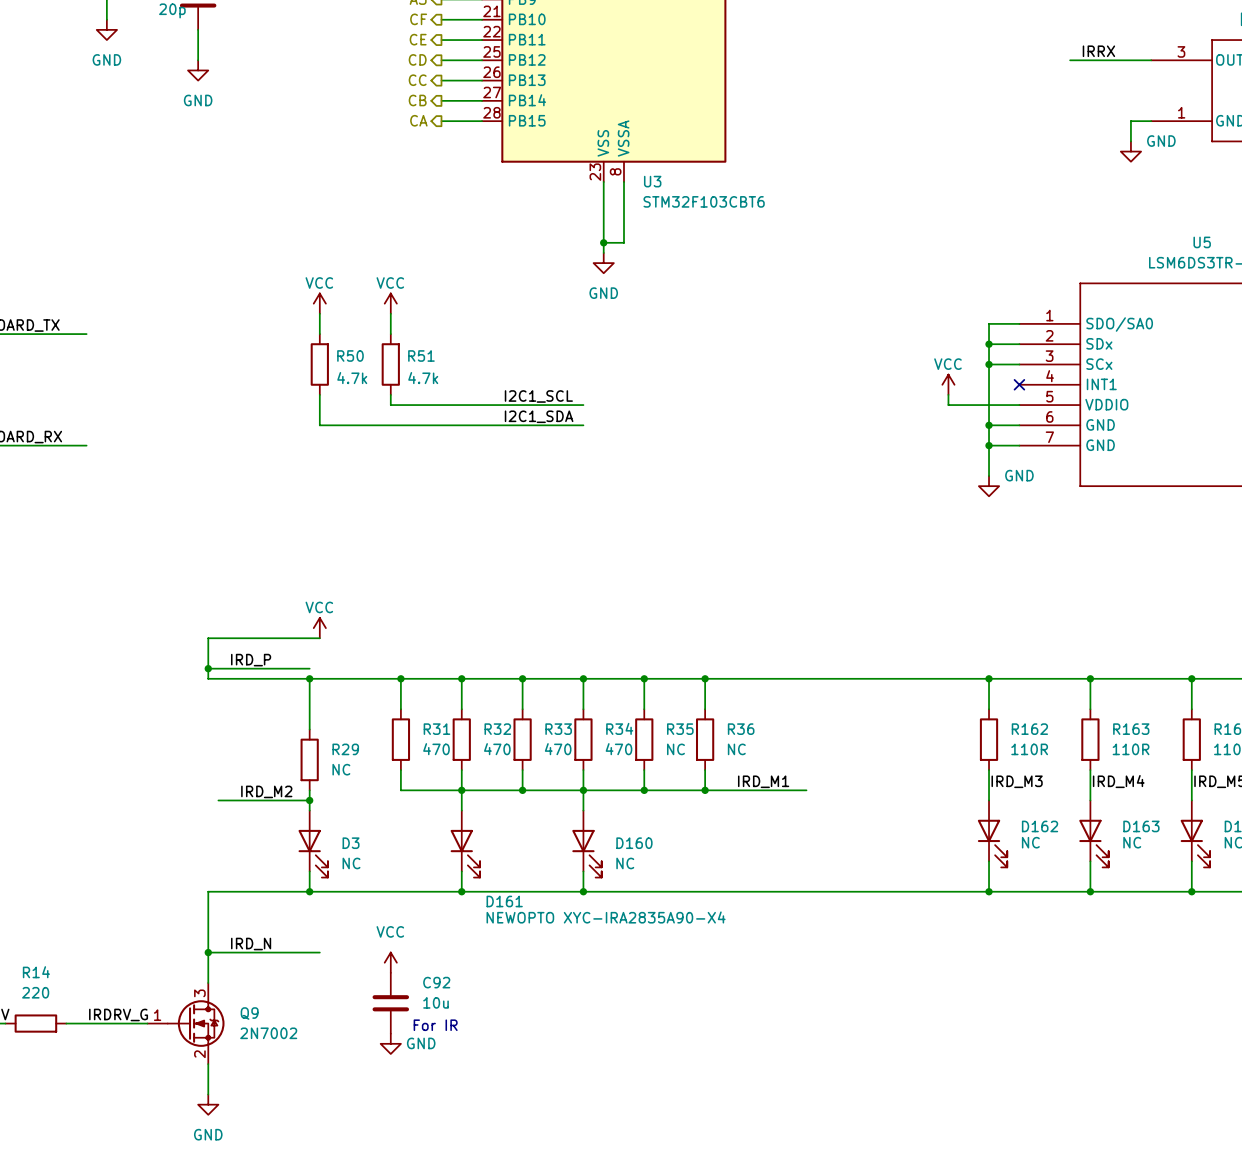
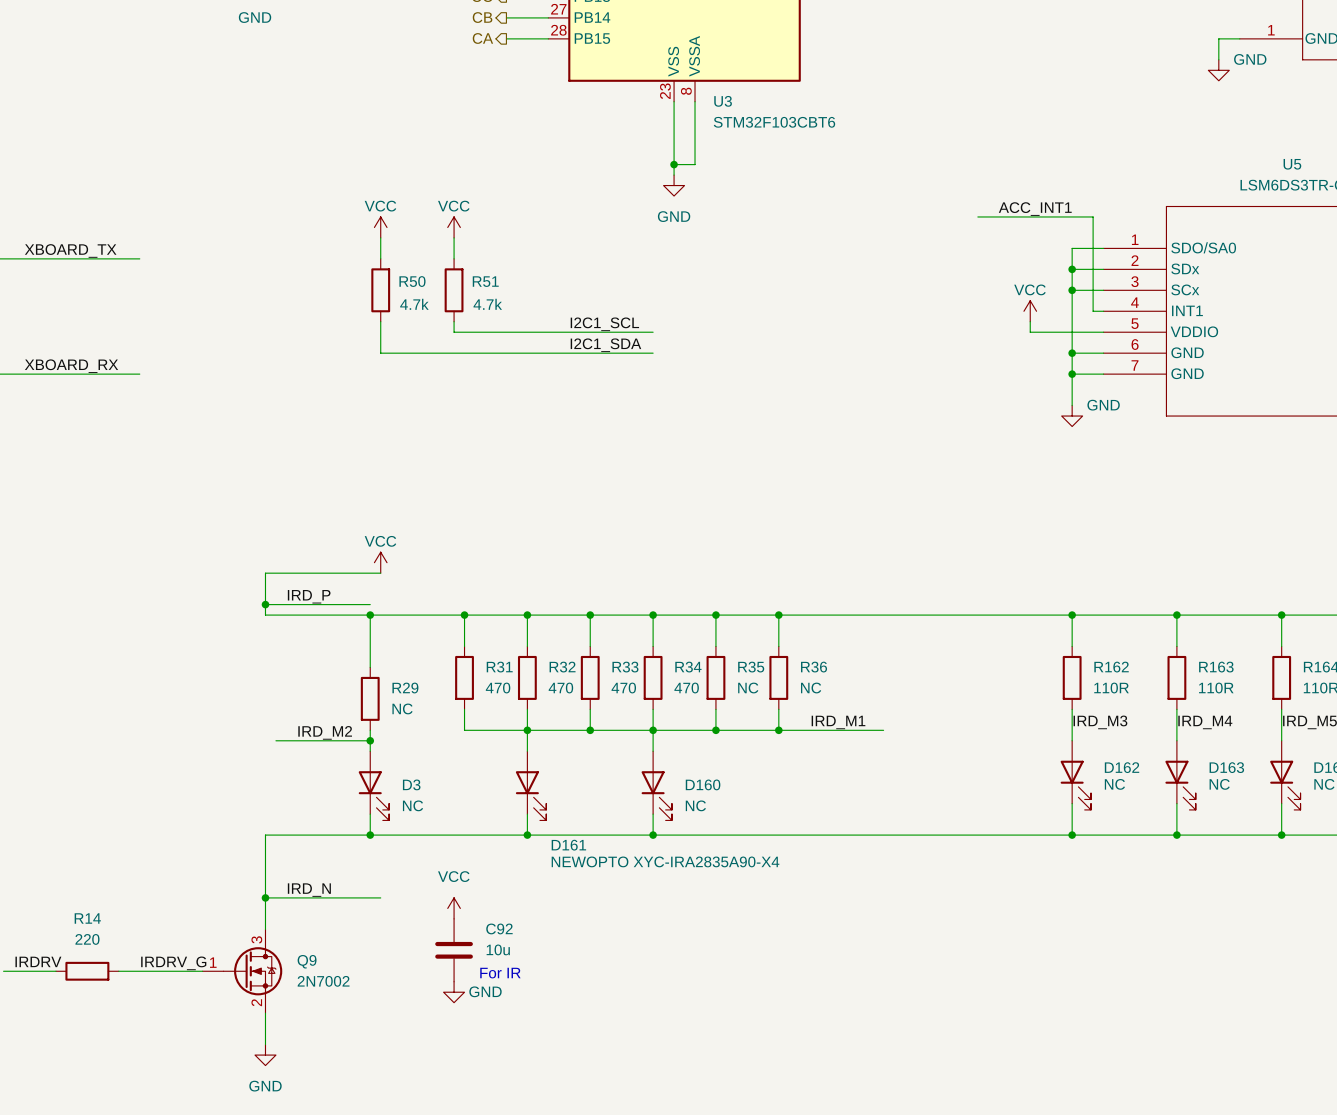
label: none -> ACC_INT1 (1035, 209)
wire: none -> (977, 216) (1093, 216) (1093, 311) (1103, 311)
no-connect mark: (1019, 384) -> none

